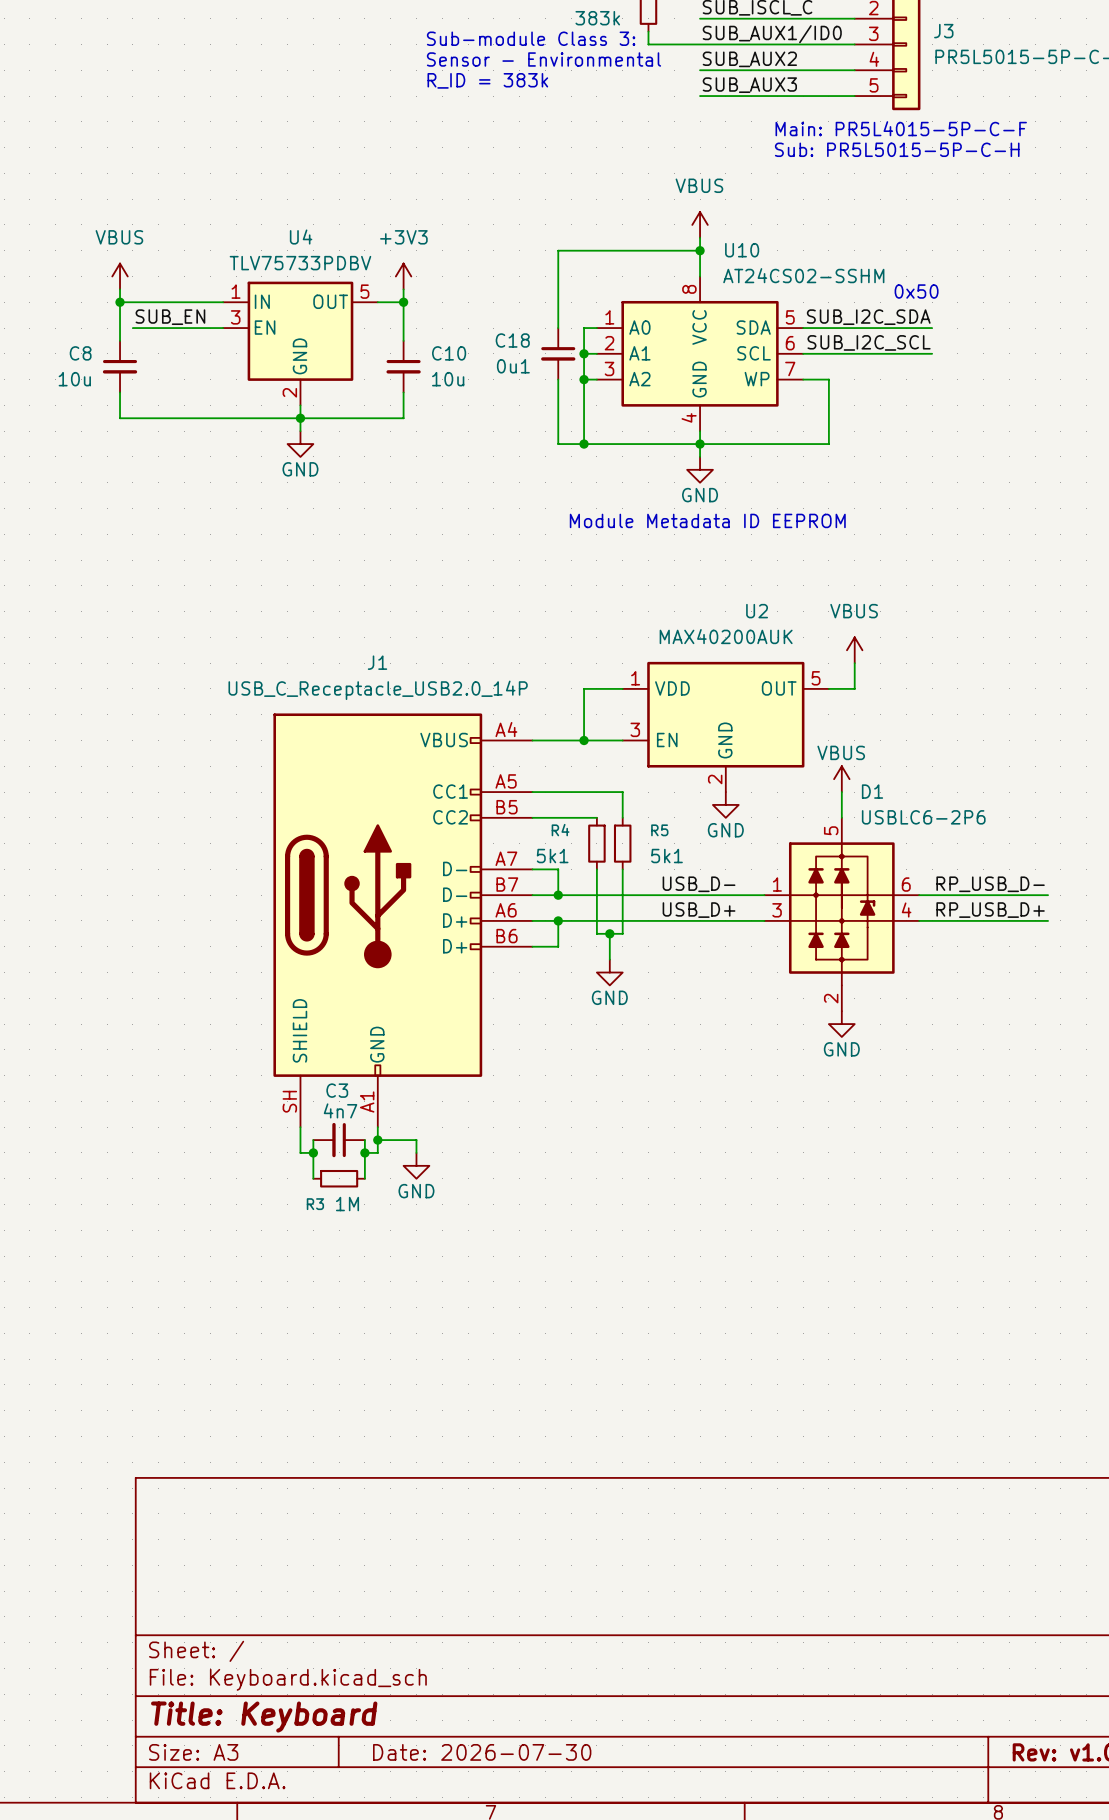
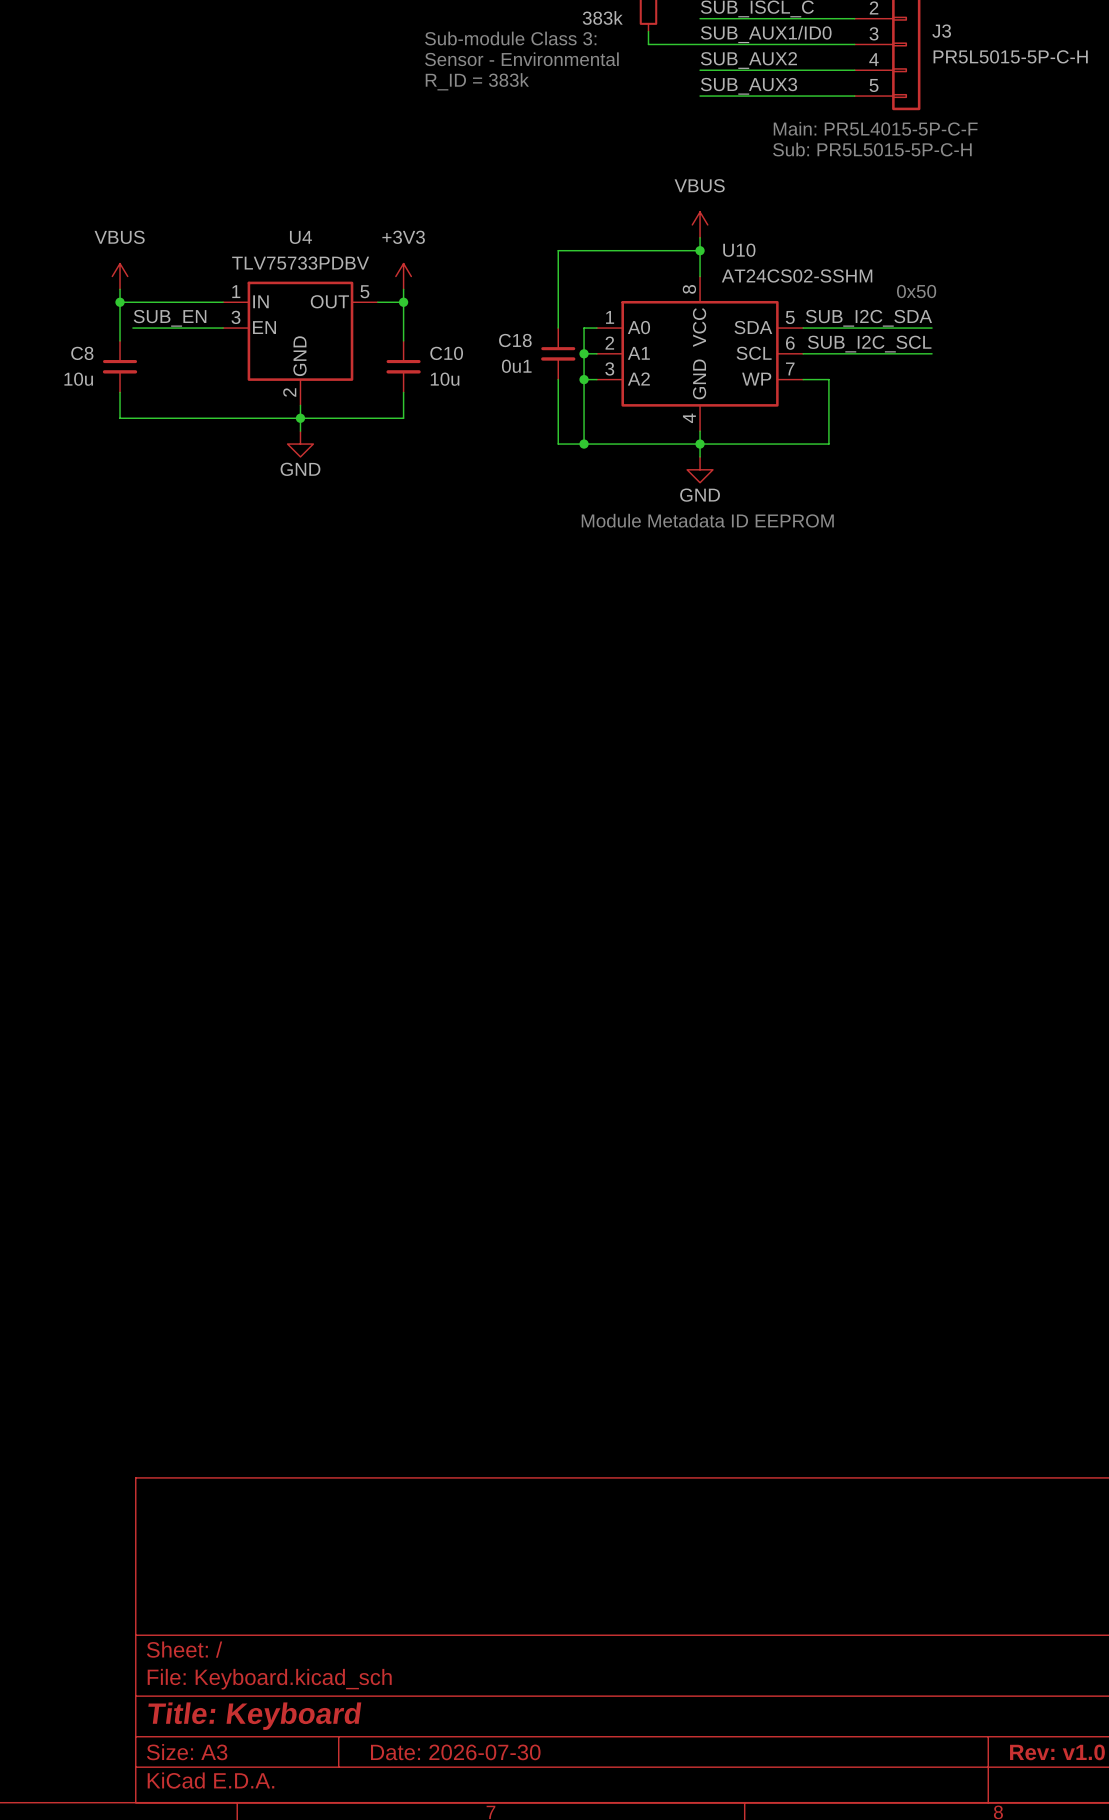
power symbol: VBUS (854, 650) -> none
wire: (854, 663) (854, 688) (828, 688) -> none
wire: (622, 688) (584, 688) (584, 740) -> none
U2: MAX40200AUK (725, 726) -> none
wire: (532, 740) (622, 740) -> none
junction: (584, 740) -> none
power symbol: VBUS (841, 779) -> none
wire: (532, 792) (622, 792) (622, 817) -> none
wire: (841, 792) (841, 817) -> none
power symbol: GND (725, 804) -> none
wire: (532, 817) (596, 817) -> none
R4: 5k1 (596, 843) -> none
R5: 5k1 (622, 843) -> none
wire: (532, 869) (558, 869) (558, 895) -> none
wire: (596, 869) (596, 933) (622, 933) (622, 869) -> none
label: USB_D- (699, 884) -> none
label: RP_USB_D- (990, 884) -> none
wire: (532, 895) (764, 895) -> none
junction: (558, 895) -> none
wire: (919, 895) (1048, 895) -> none
label: USB_D+ (699, 910) -> none
label: RP_USB_D+ (990, 910) -> none
D1: USBLC6-2P6 (841, 914) -> none
J1: USB_C_Receptacle_USB2.0_14P (402, 920) -> none
wire: (532, 920) (764, 920) -> none
wire: (558, 920) (558, 946) (532, 946) -> none
junction: (558, 920) -> none
wire: (919, 920) (1048, 920) -> none
wire: (609, 933) (609, 959) -> none
junction: (609, 933) -> none
power symbol: GND (609, 972) -> none
power symbol: GND (841, 1024) -> none
wire: (300, 1127) (300, 1152) (313, 1152) -> none
wire: (377, 1127) (377, 1152) (364, 1152) -> none
wire: (313, 1140) (313, 1178) -> none
C3: 4n7 (339, 1140) -> none
wire: (364, 1140) (364, 1178) -> none
wire: (377, 1140) (416, 1140) (416, 1152) -> none
junction: (377, 1140) -> none
junction: (313, 1152) -> none
junction: (364, 1152) -> none
power symbol: GND (416, 1165) -> none
R3: 1M (339, 1178) -> none

